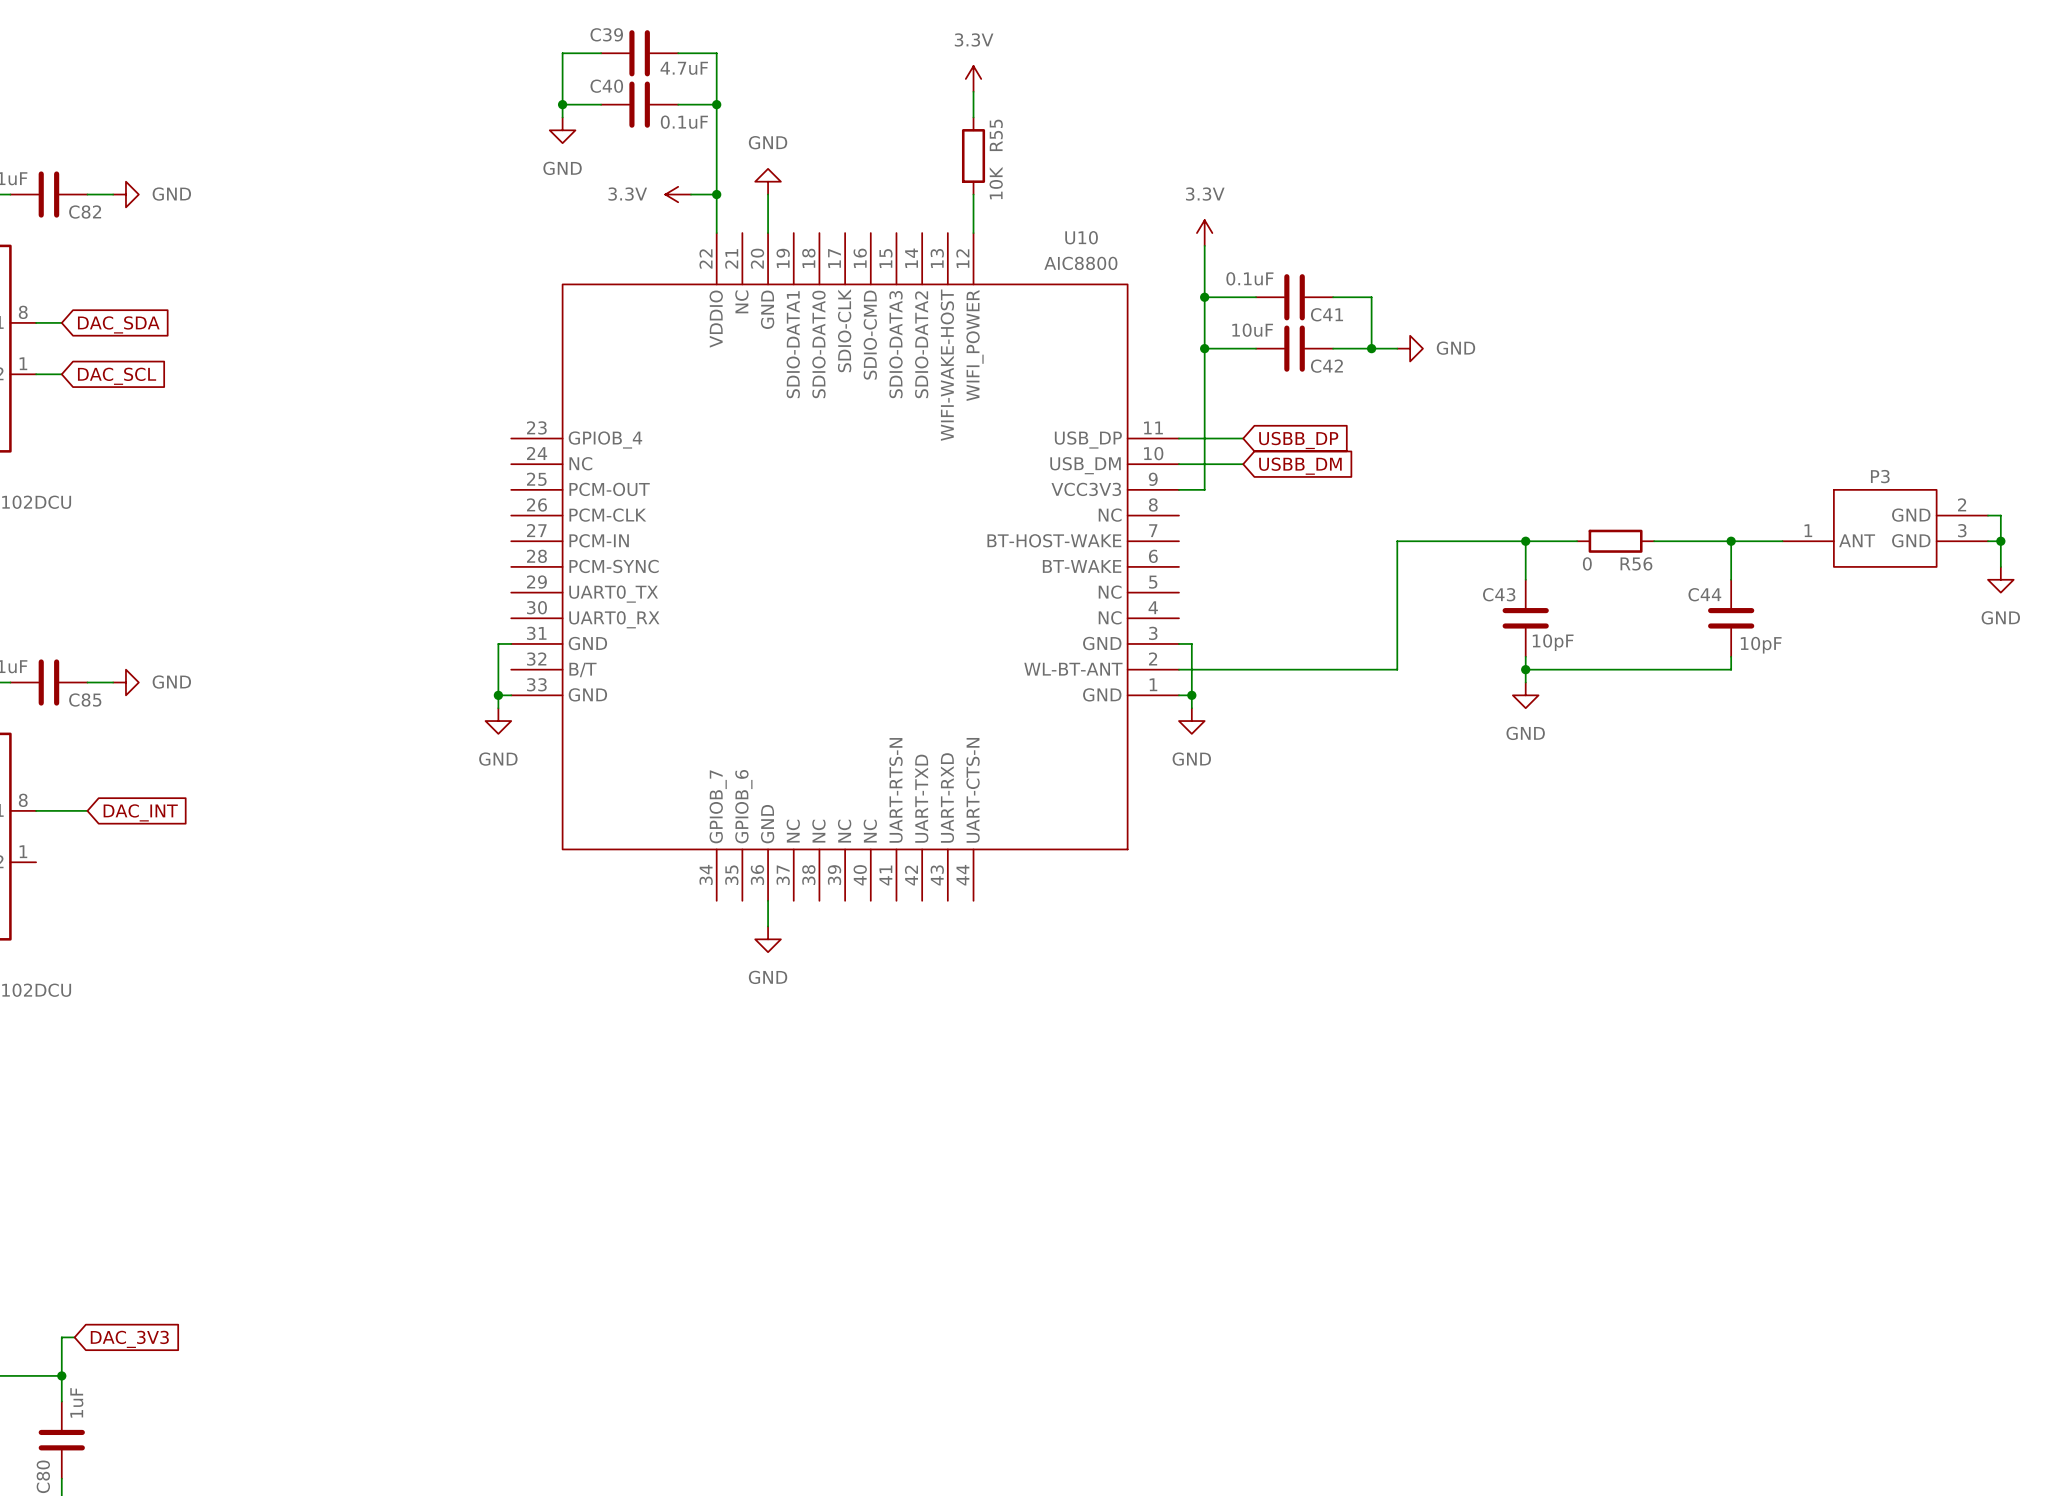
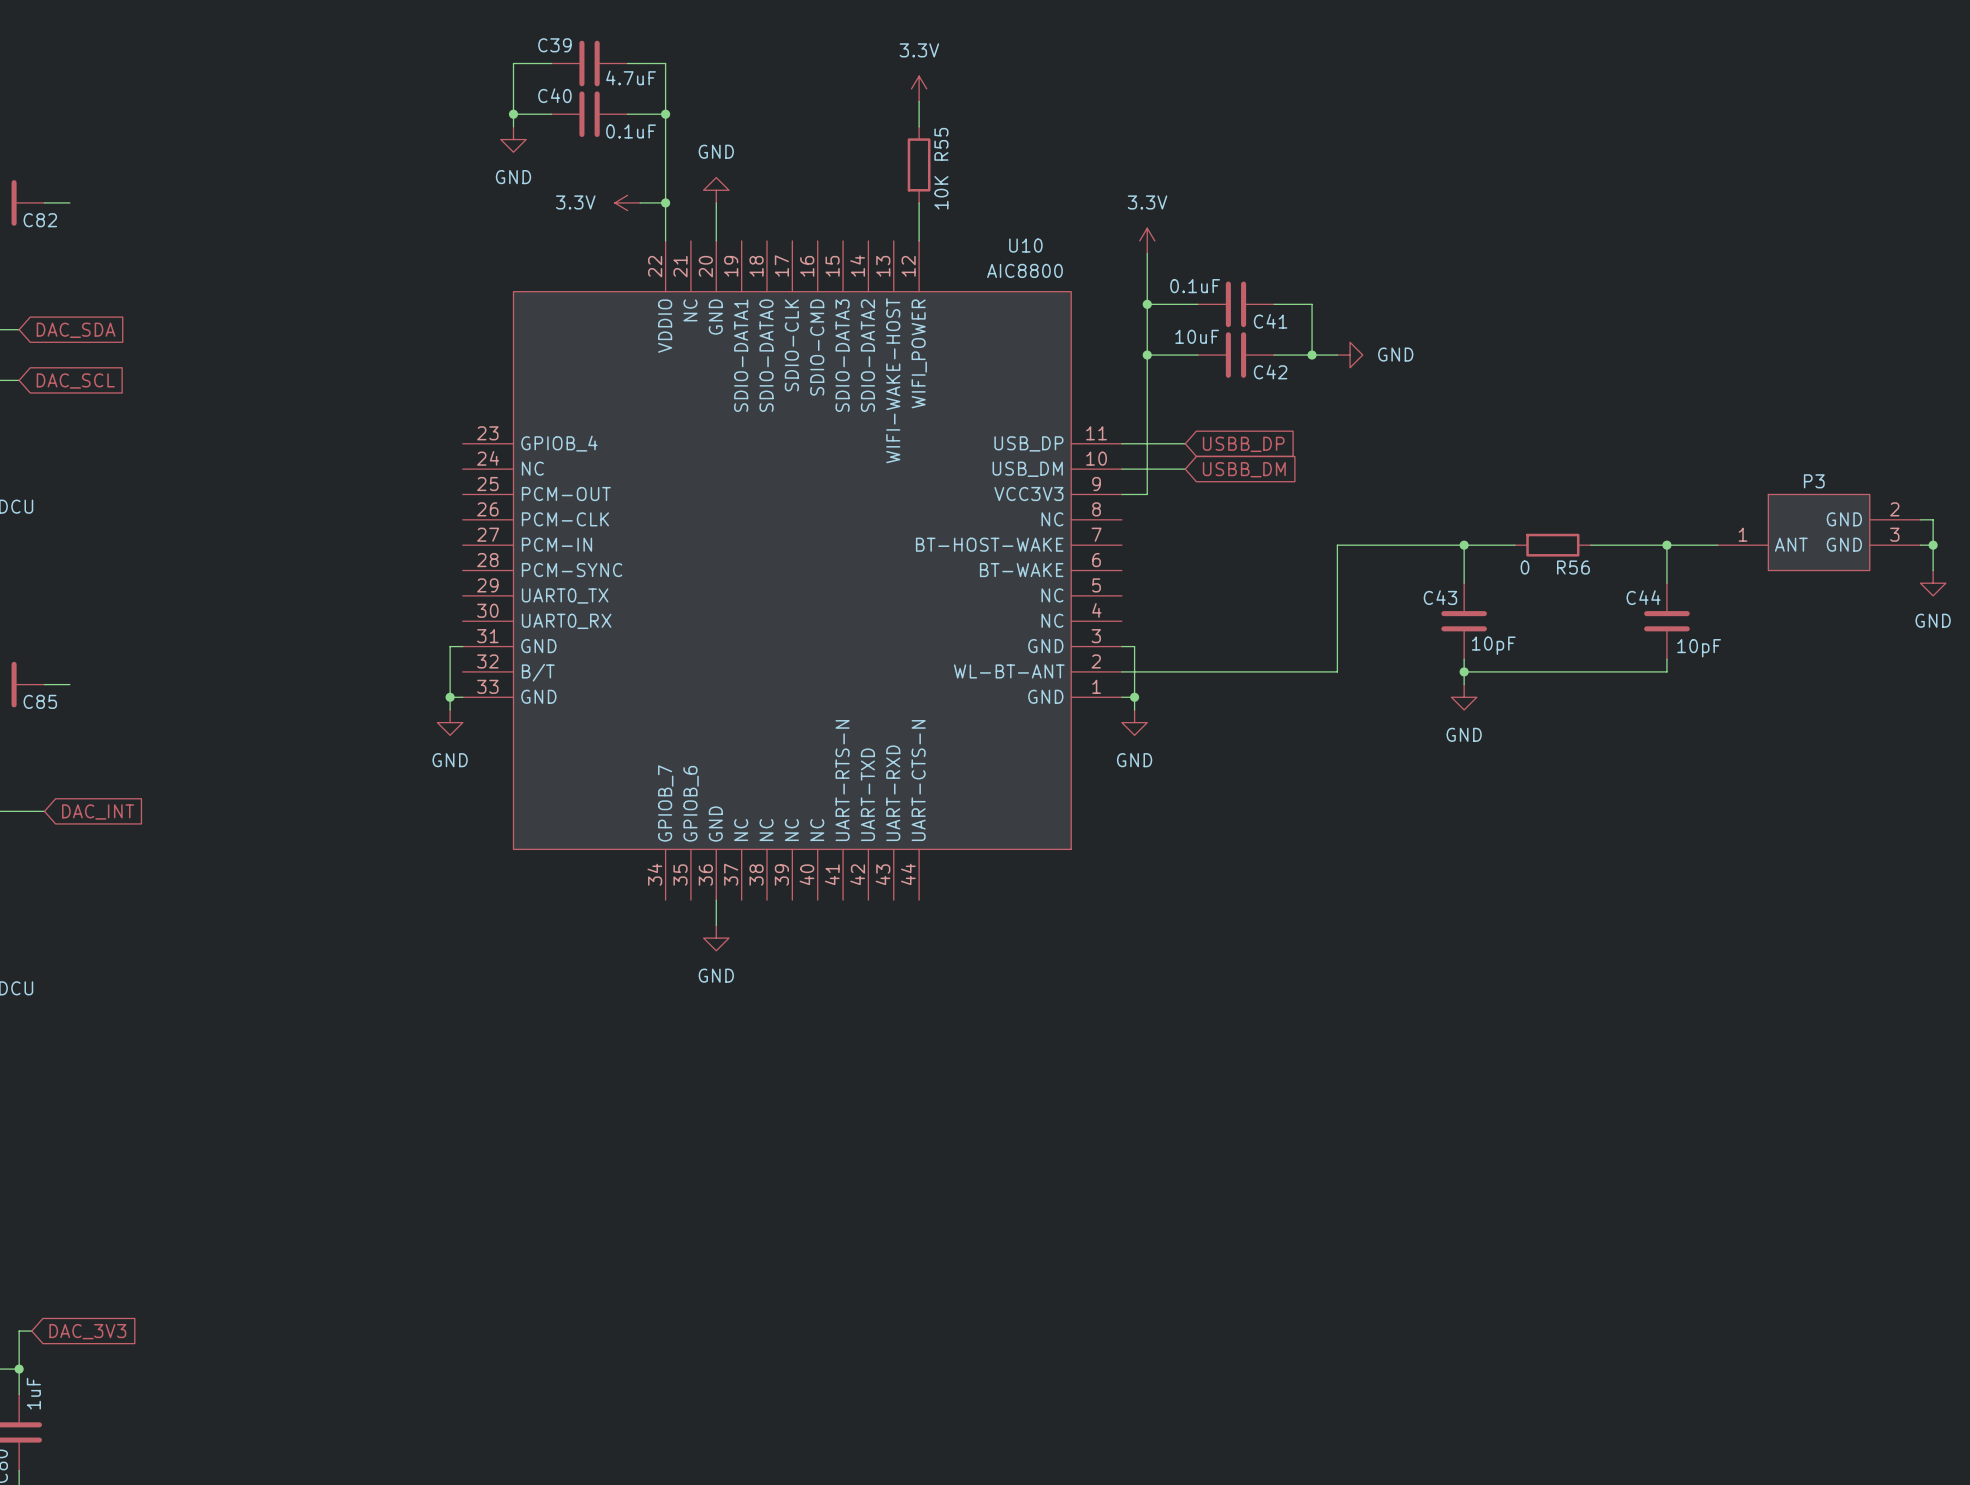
power symbol: GND (125, 194) -> none
power symbol: GND (125, 682) -> none

